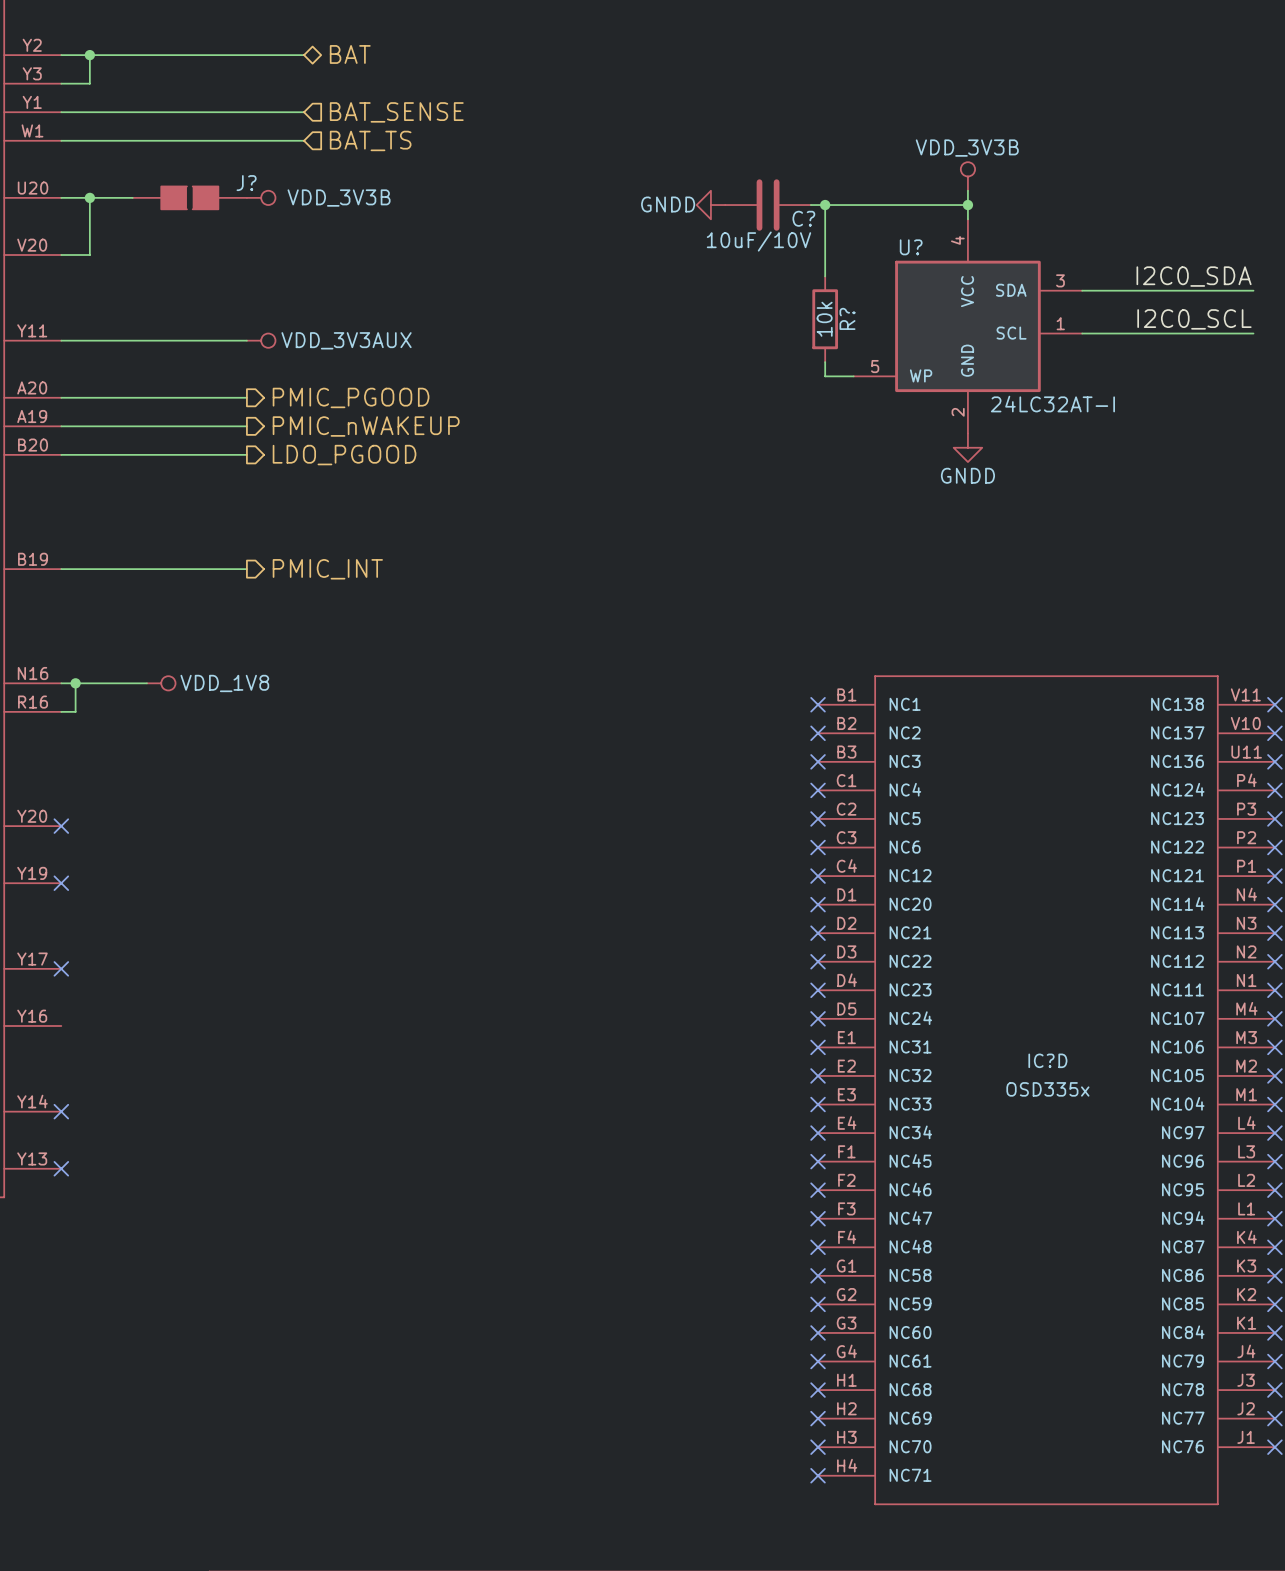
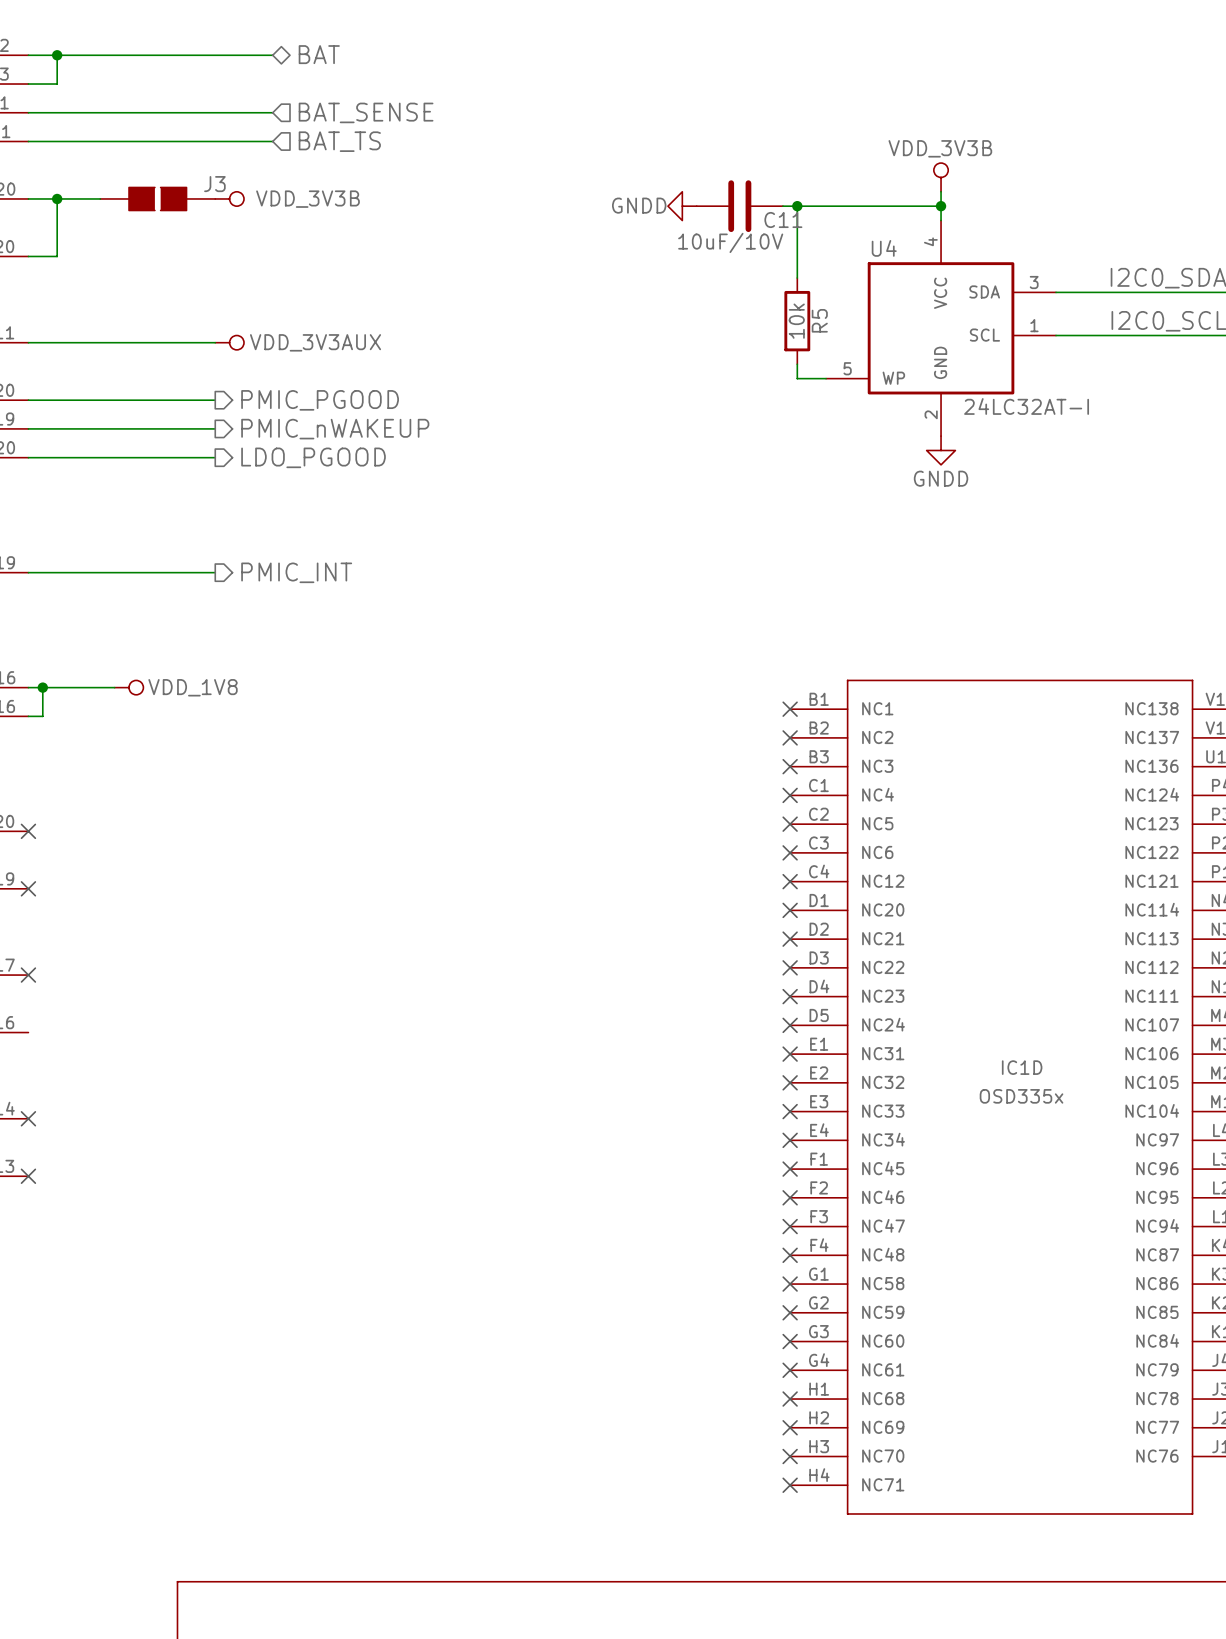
J? name: J? (246, 183) -> J3 (214, 184)
C? name: C? (803, 218) -> C11 (783, 220)
U? name: U? (911, 247) -> U4 (884, 248)
R? name: R? (847, 318) -> R5 (819, 320)
IC?D name: IC?D (1047, 1060) -> IC1D (1022, 1067)

